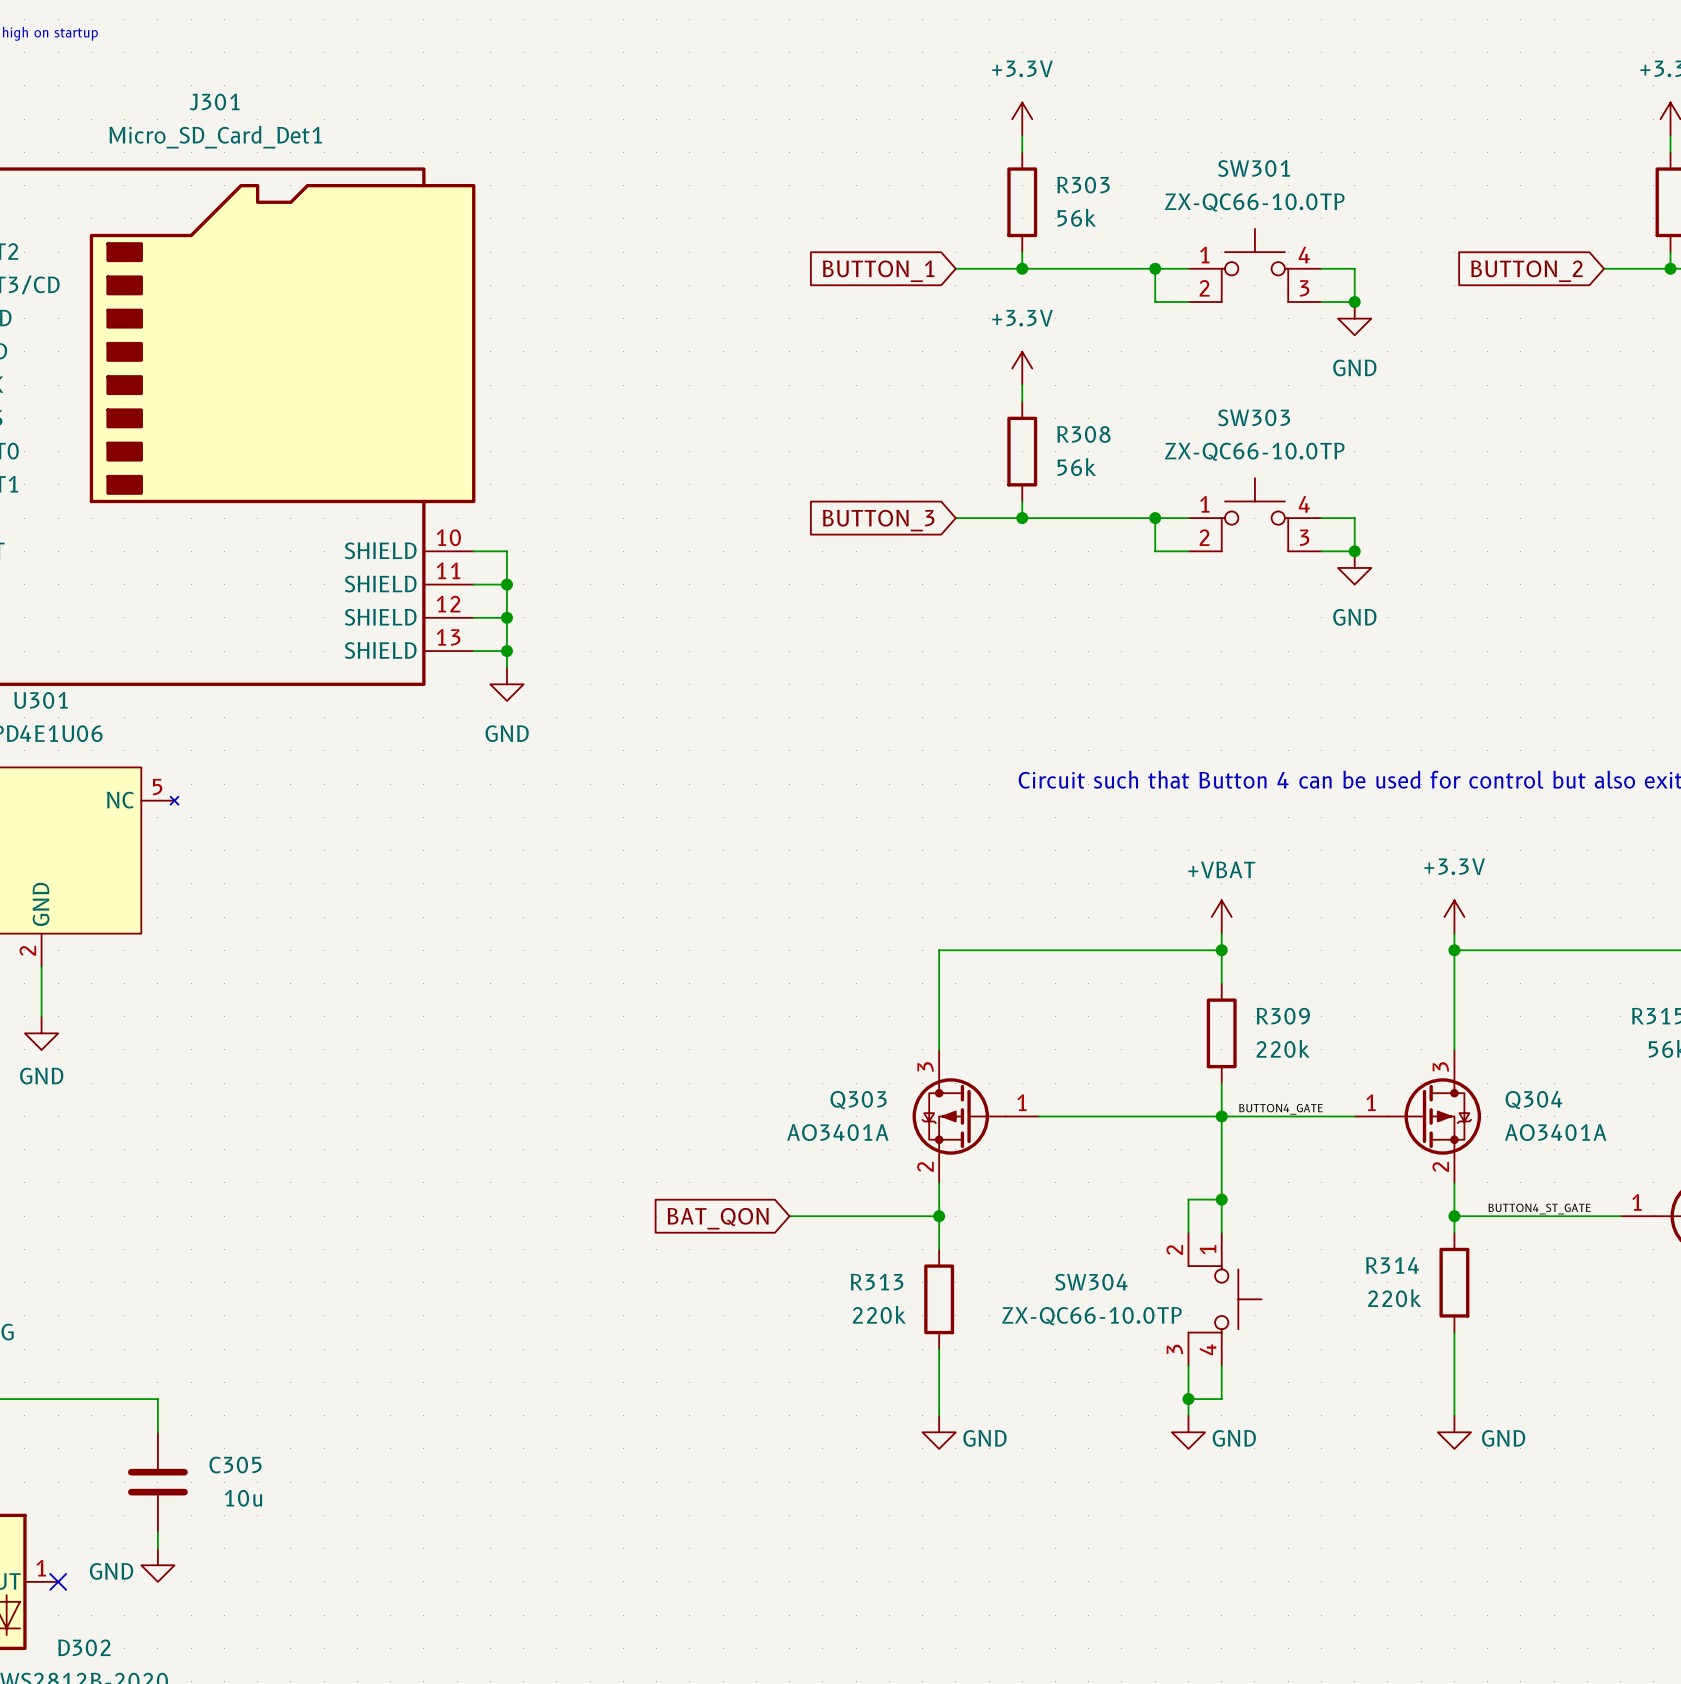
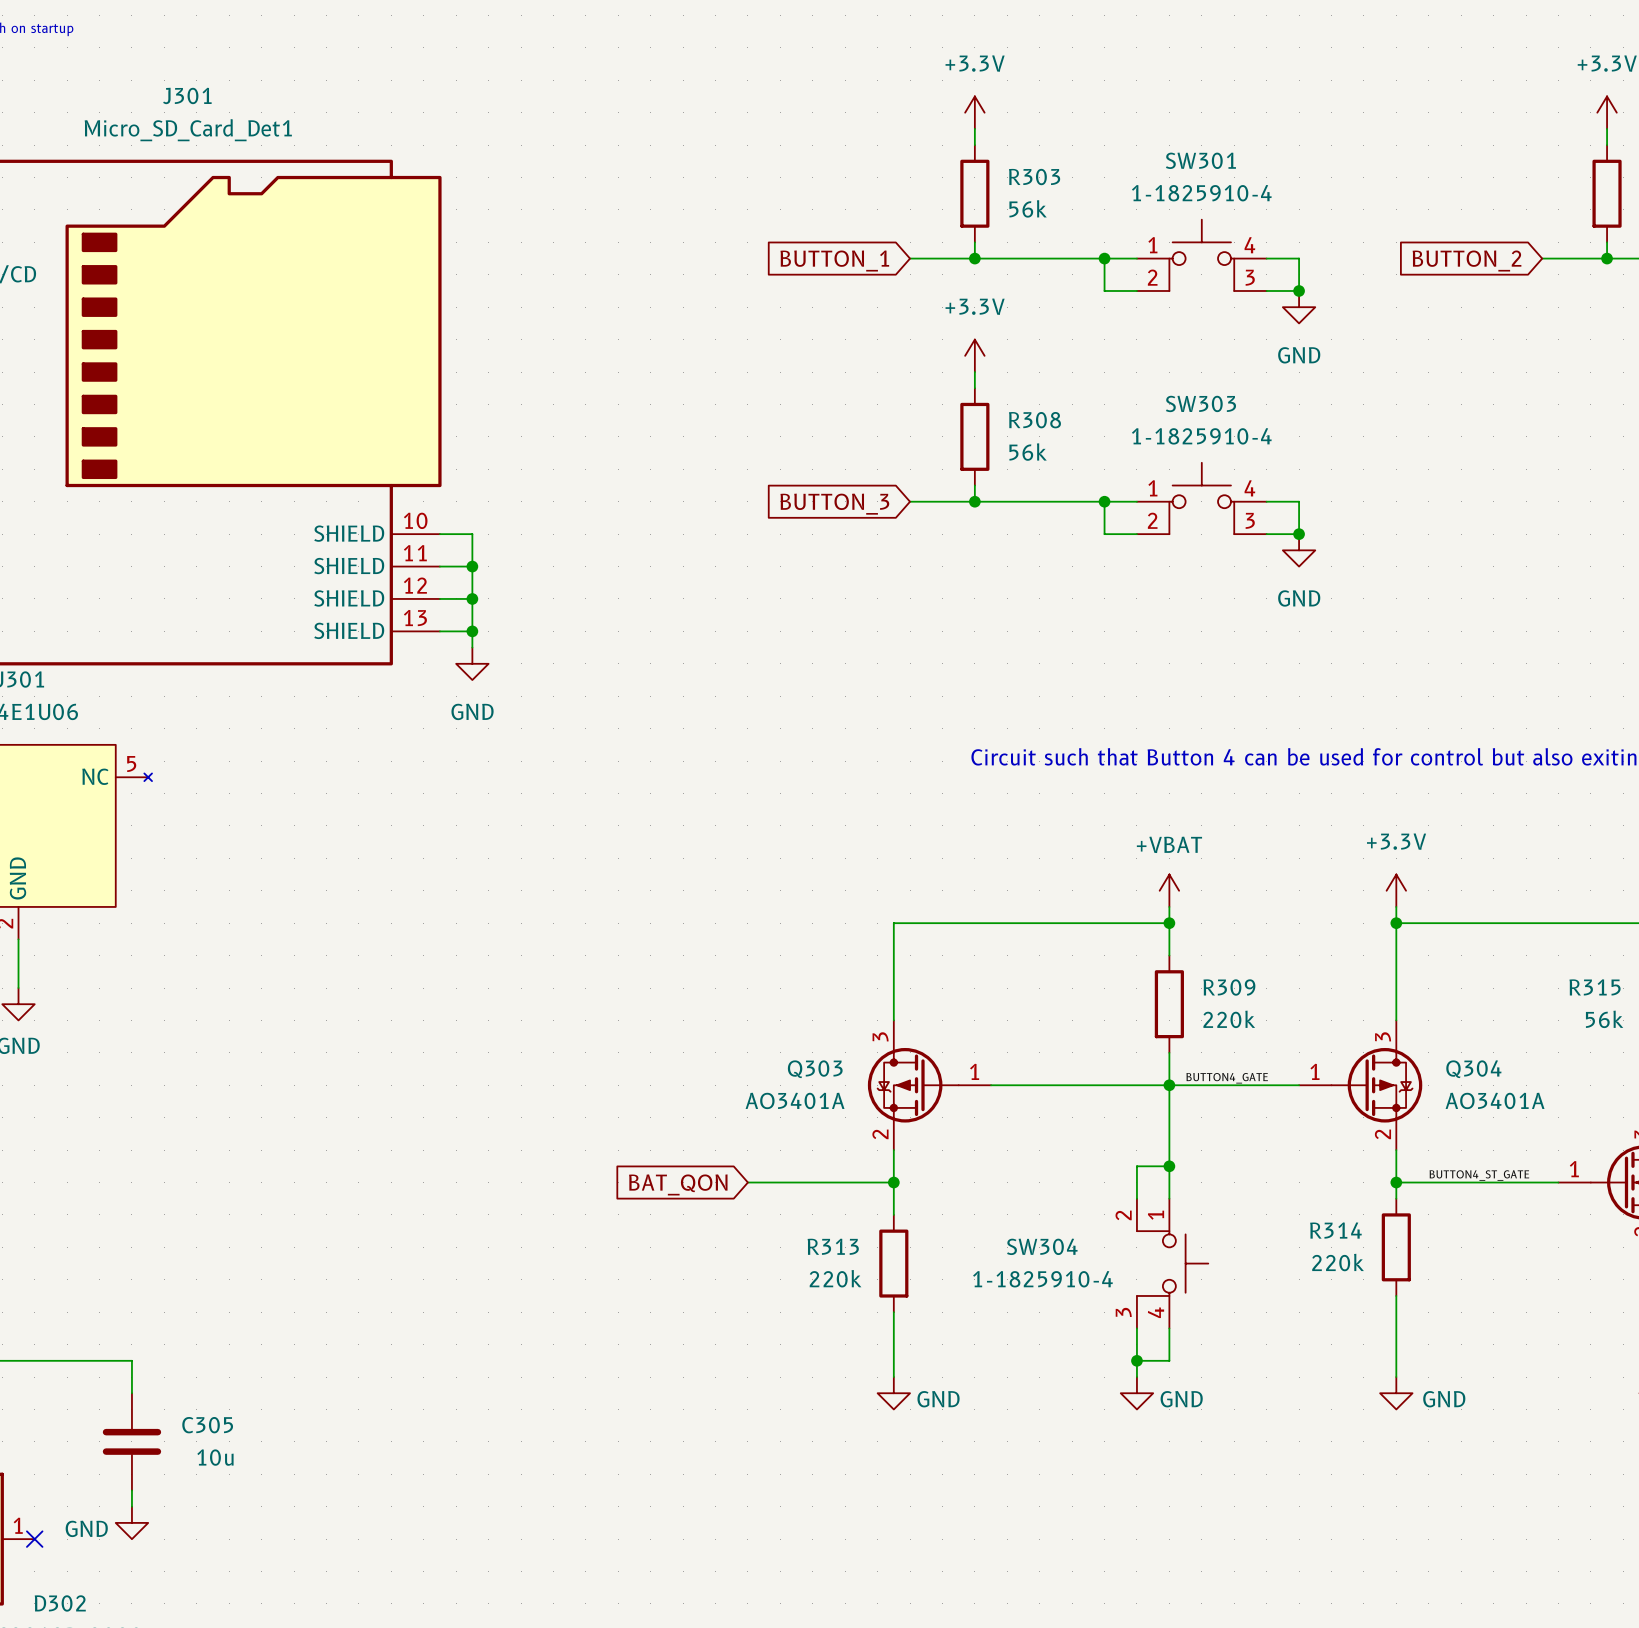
SW301 value: ZX-QC66-10.0TP (1254, 202) -> 1-1825910-4 (1201, 193)
SW303 value: ZX-QC66-10.0TP (1254, 451) -> 1-1825910-4 (1201, 436)
SW304 value: ZX-QC66-10.0TP (1091, 1316) -> 1-1825910-4 (1042, 1279)

